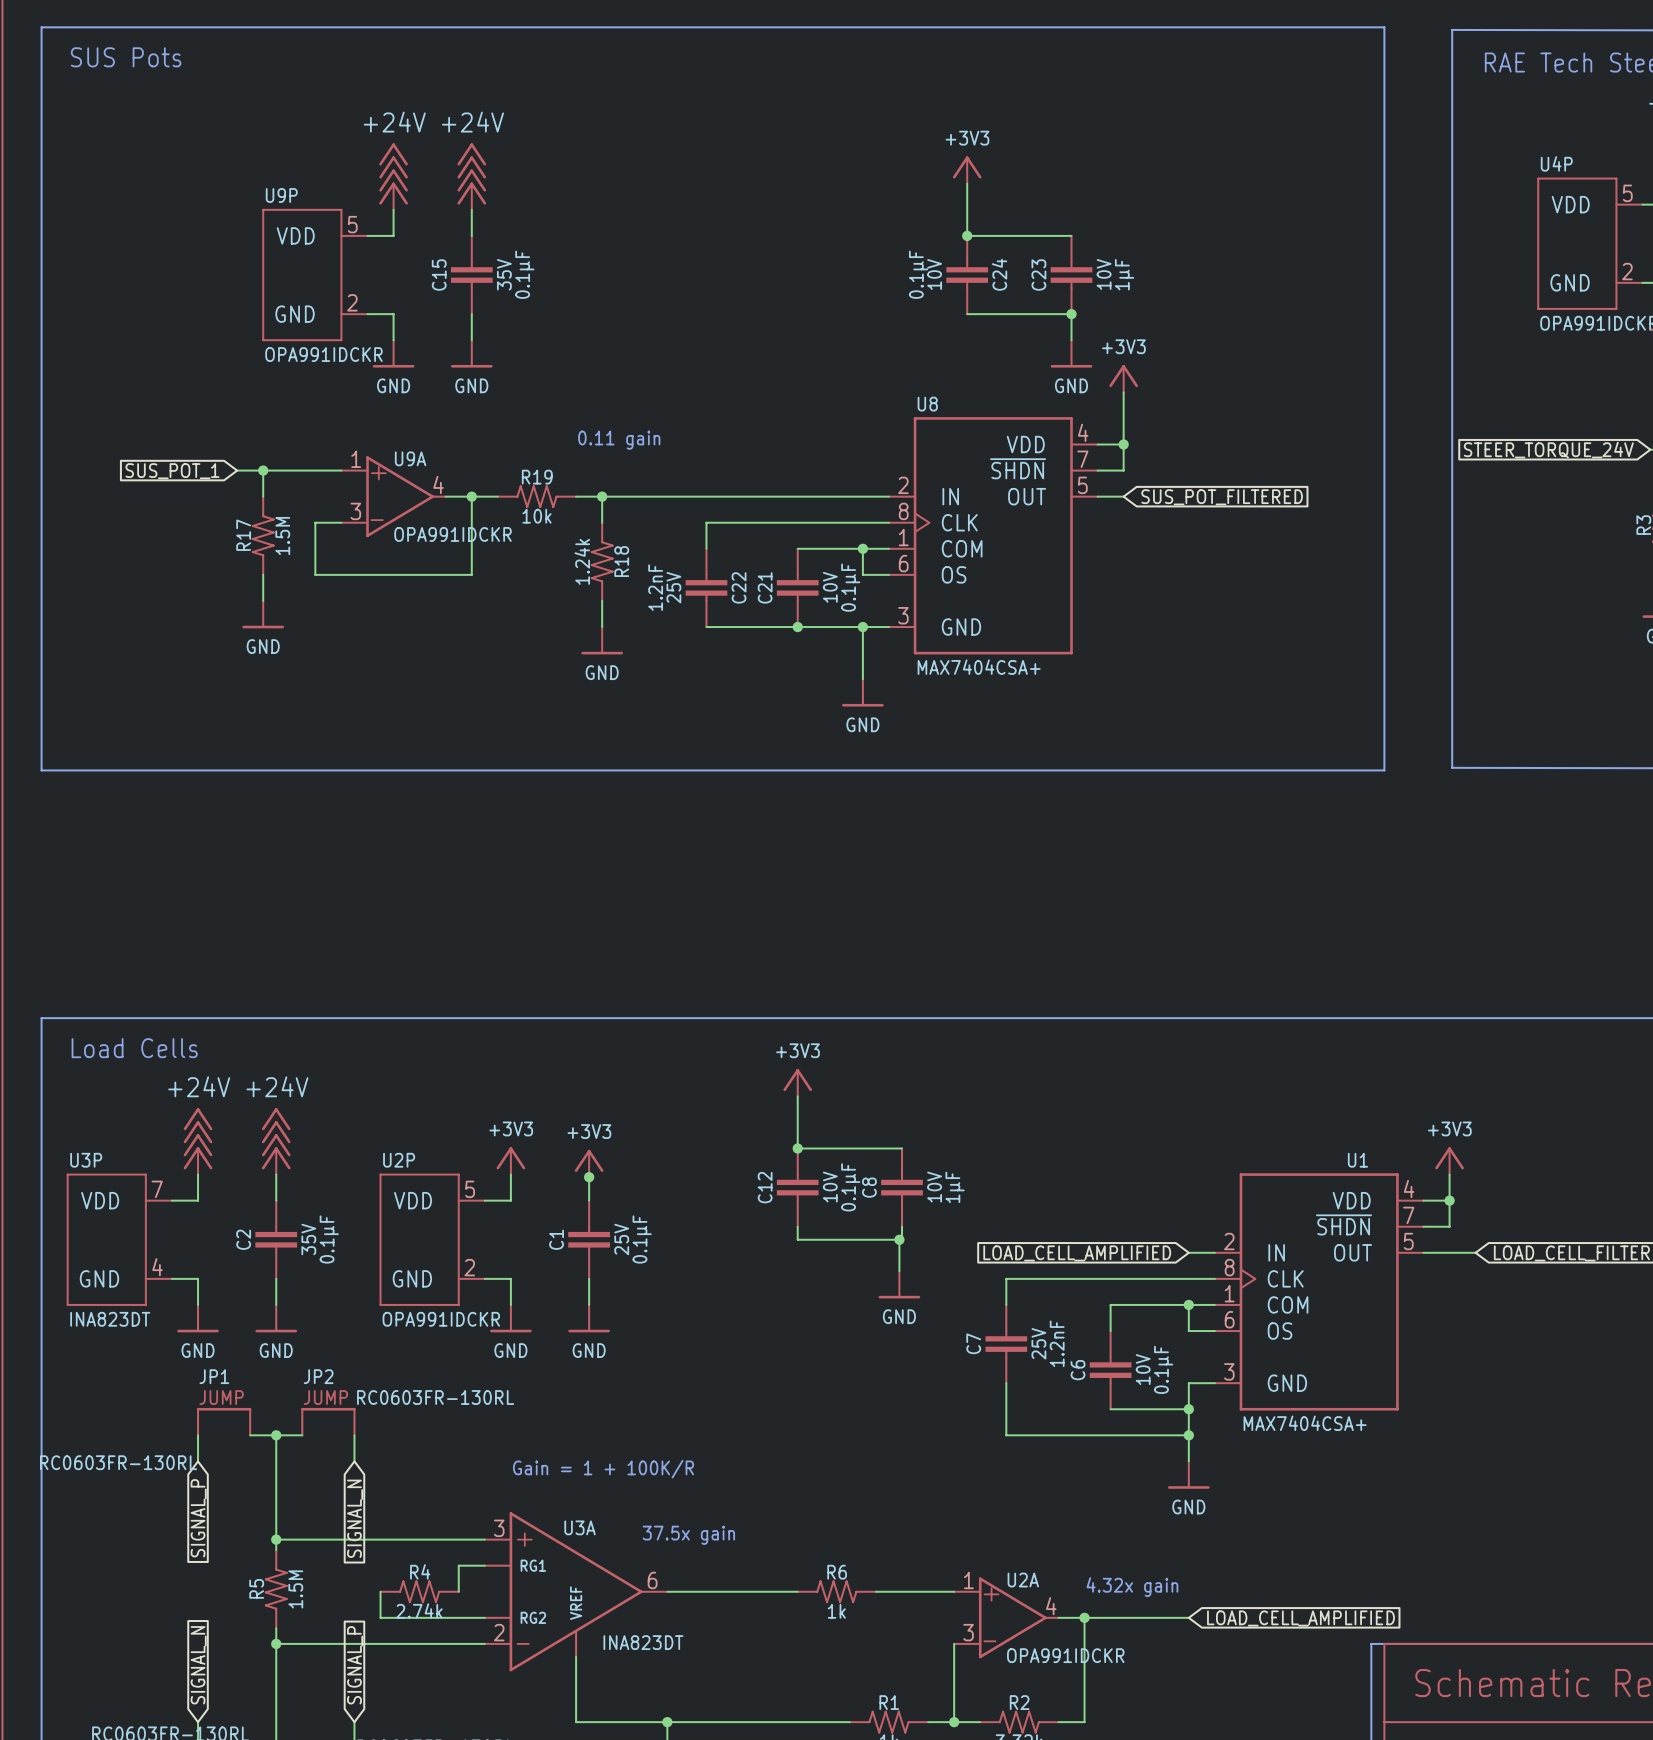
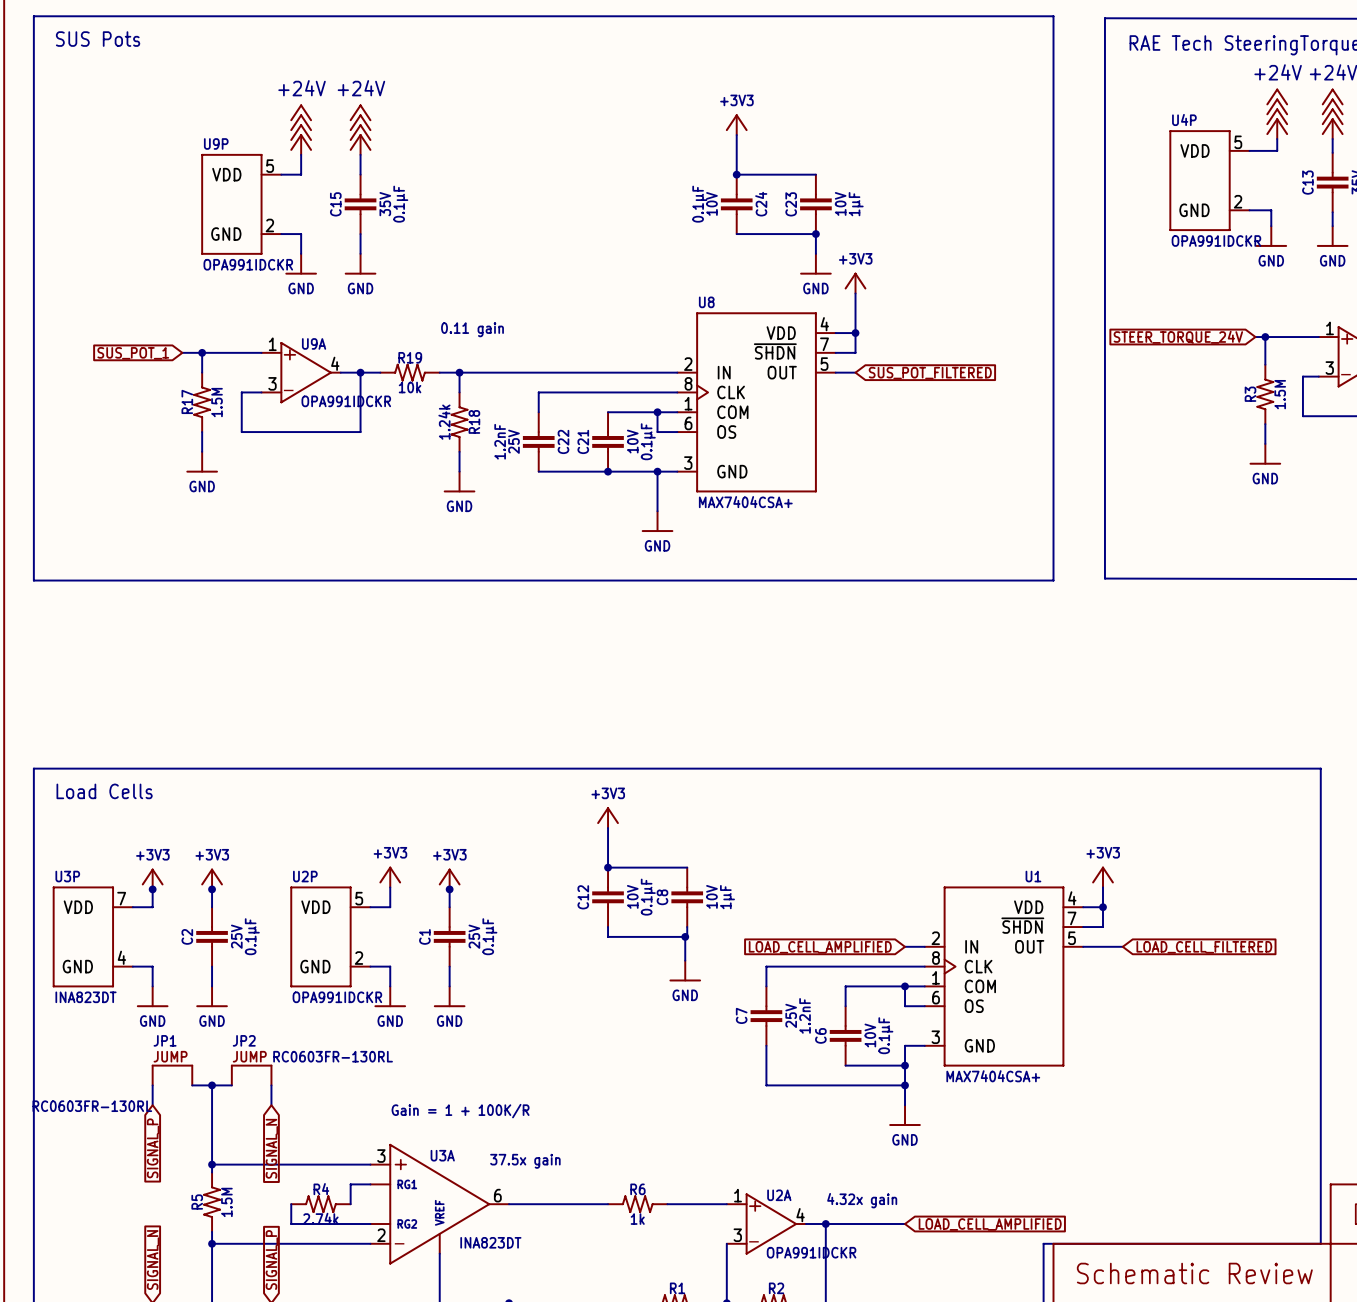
power symbol: +24V (198, 1141) -> none
power symbol: +24V (276, 1141) -> none
power symbol: none -> +3V3 (152, 879)
power symbol: none -> +3V3 (212, 879)
junction: none -> (152, 889)
junction: none -> (212, 889)
C2 text: 35V (308, 1239) -> 25V (236, 936)

